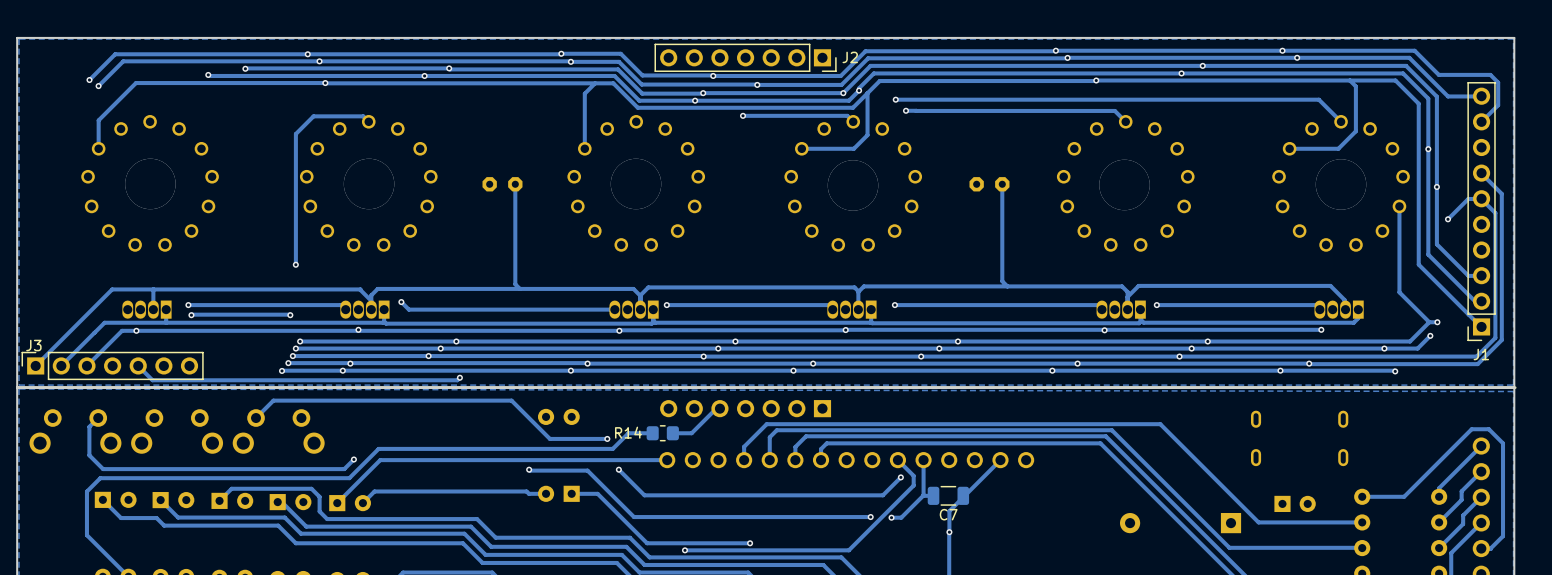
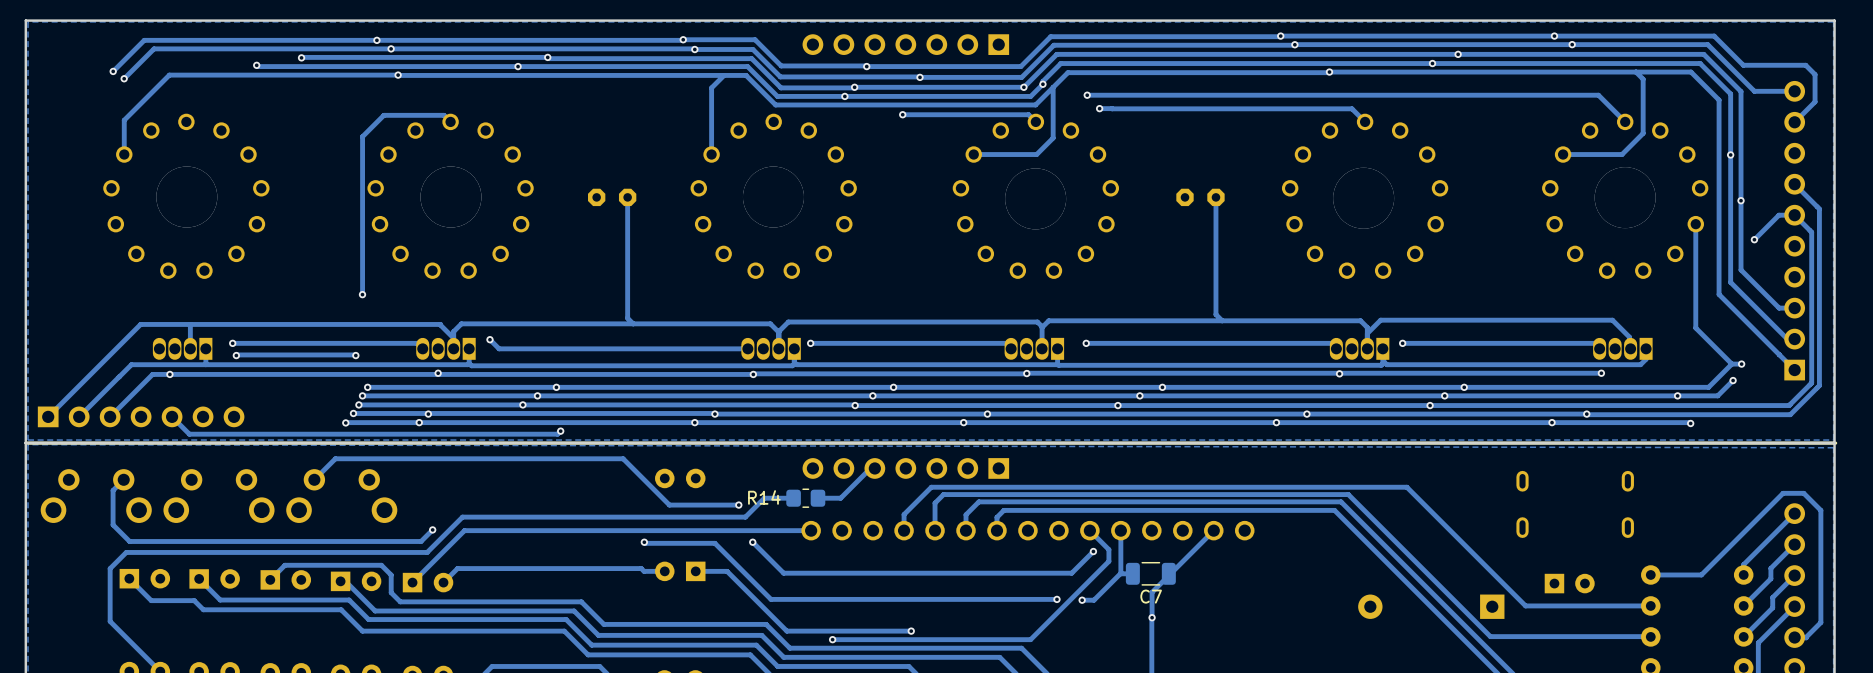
J2 side: bottom (745, 57) -> top (905, 44)
J1 side: bottom (1481, 211) -> top (1794, 230)
J3 side: bottom (112, 365) -> top (141, 416)

